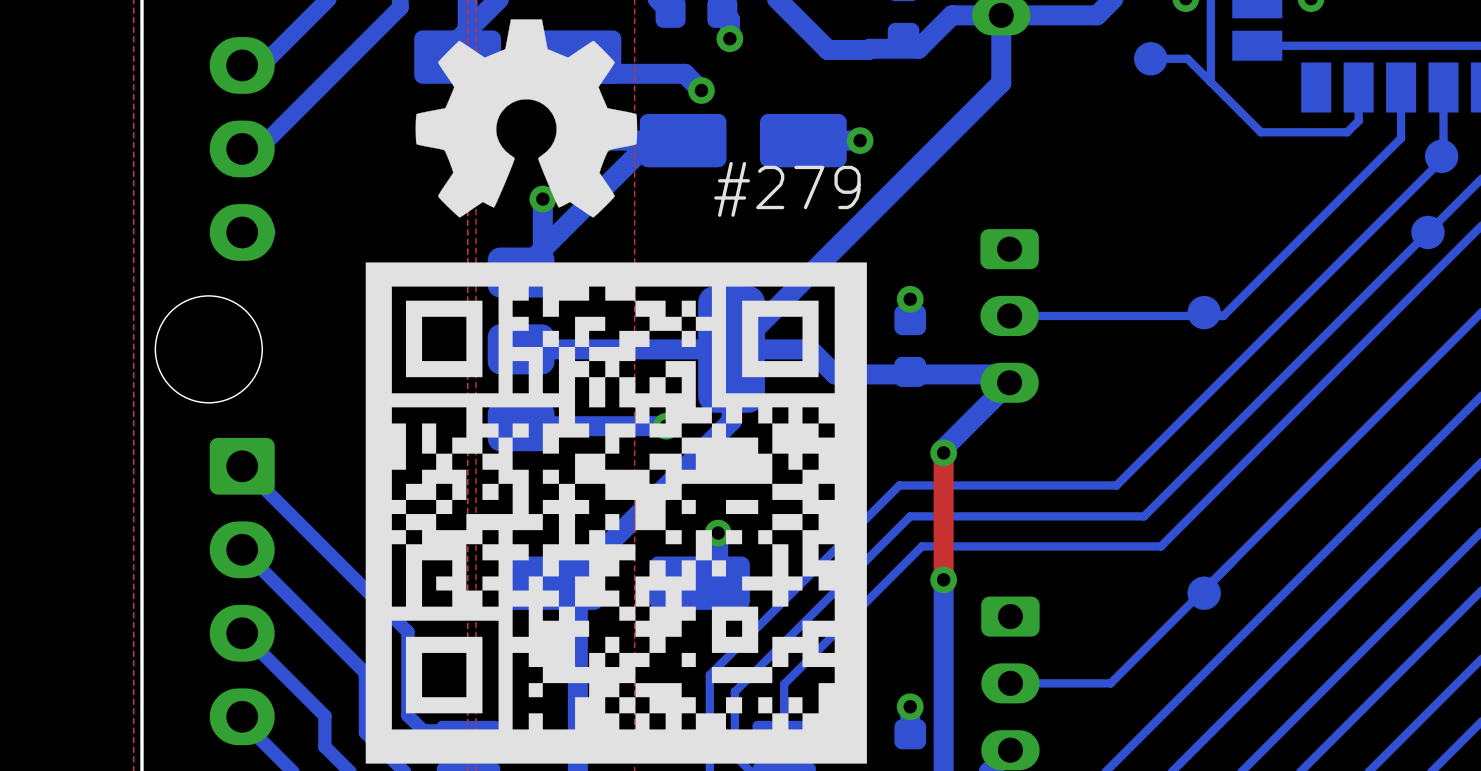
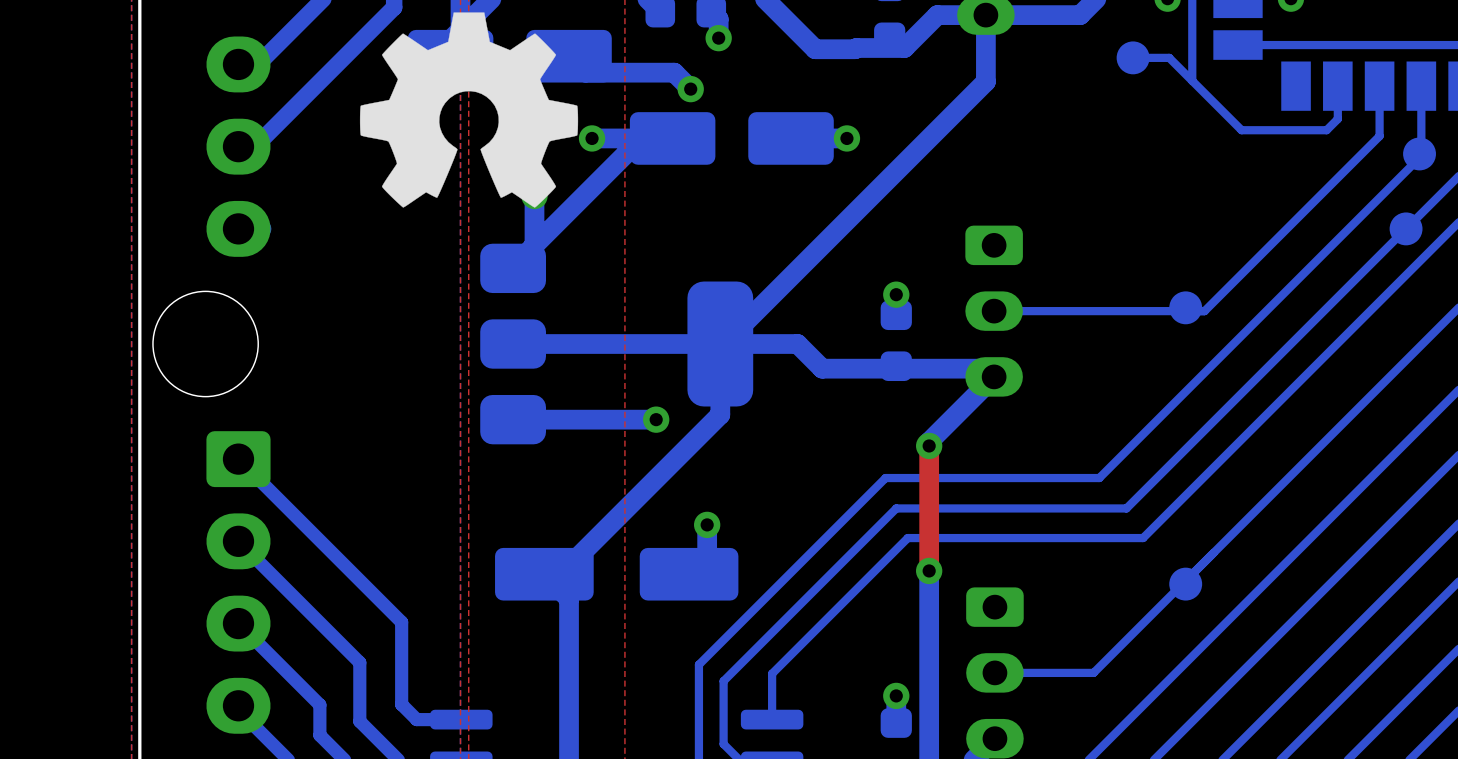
drawing position: (526, 118) -> (469, 110)
text: #279 (787, 189) -> none
drawing: [365, 262, 867, 764] -> none

